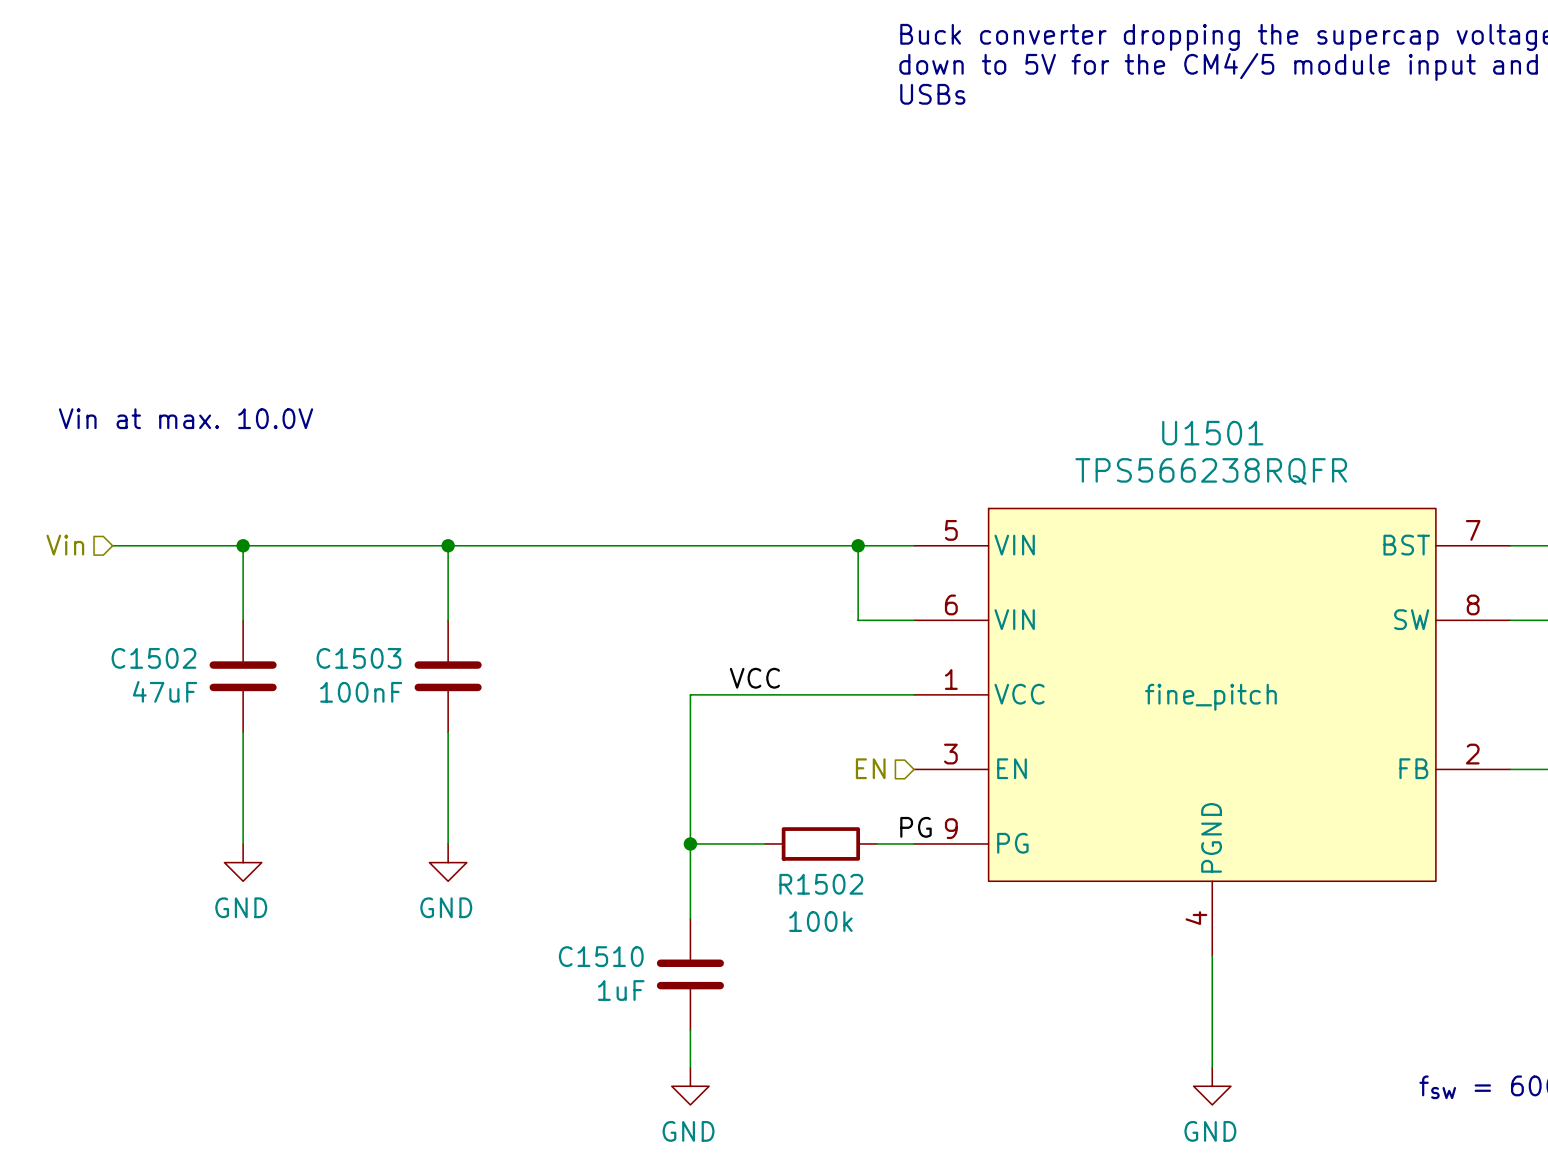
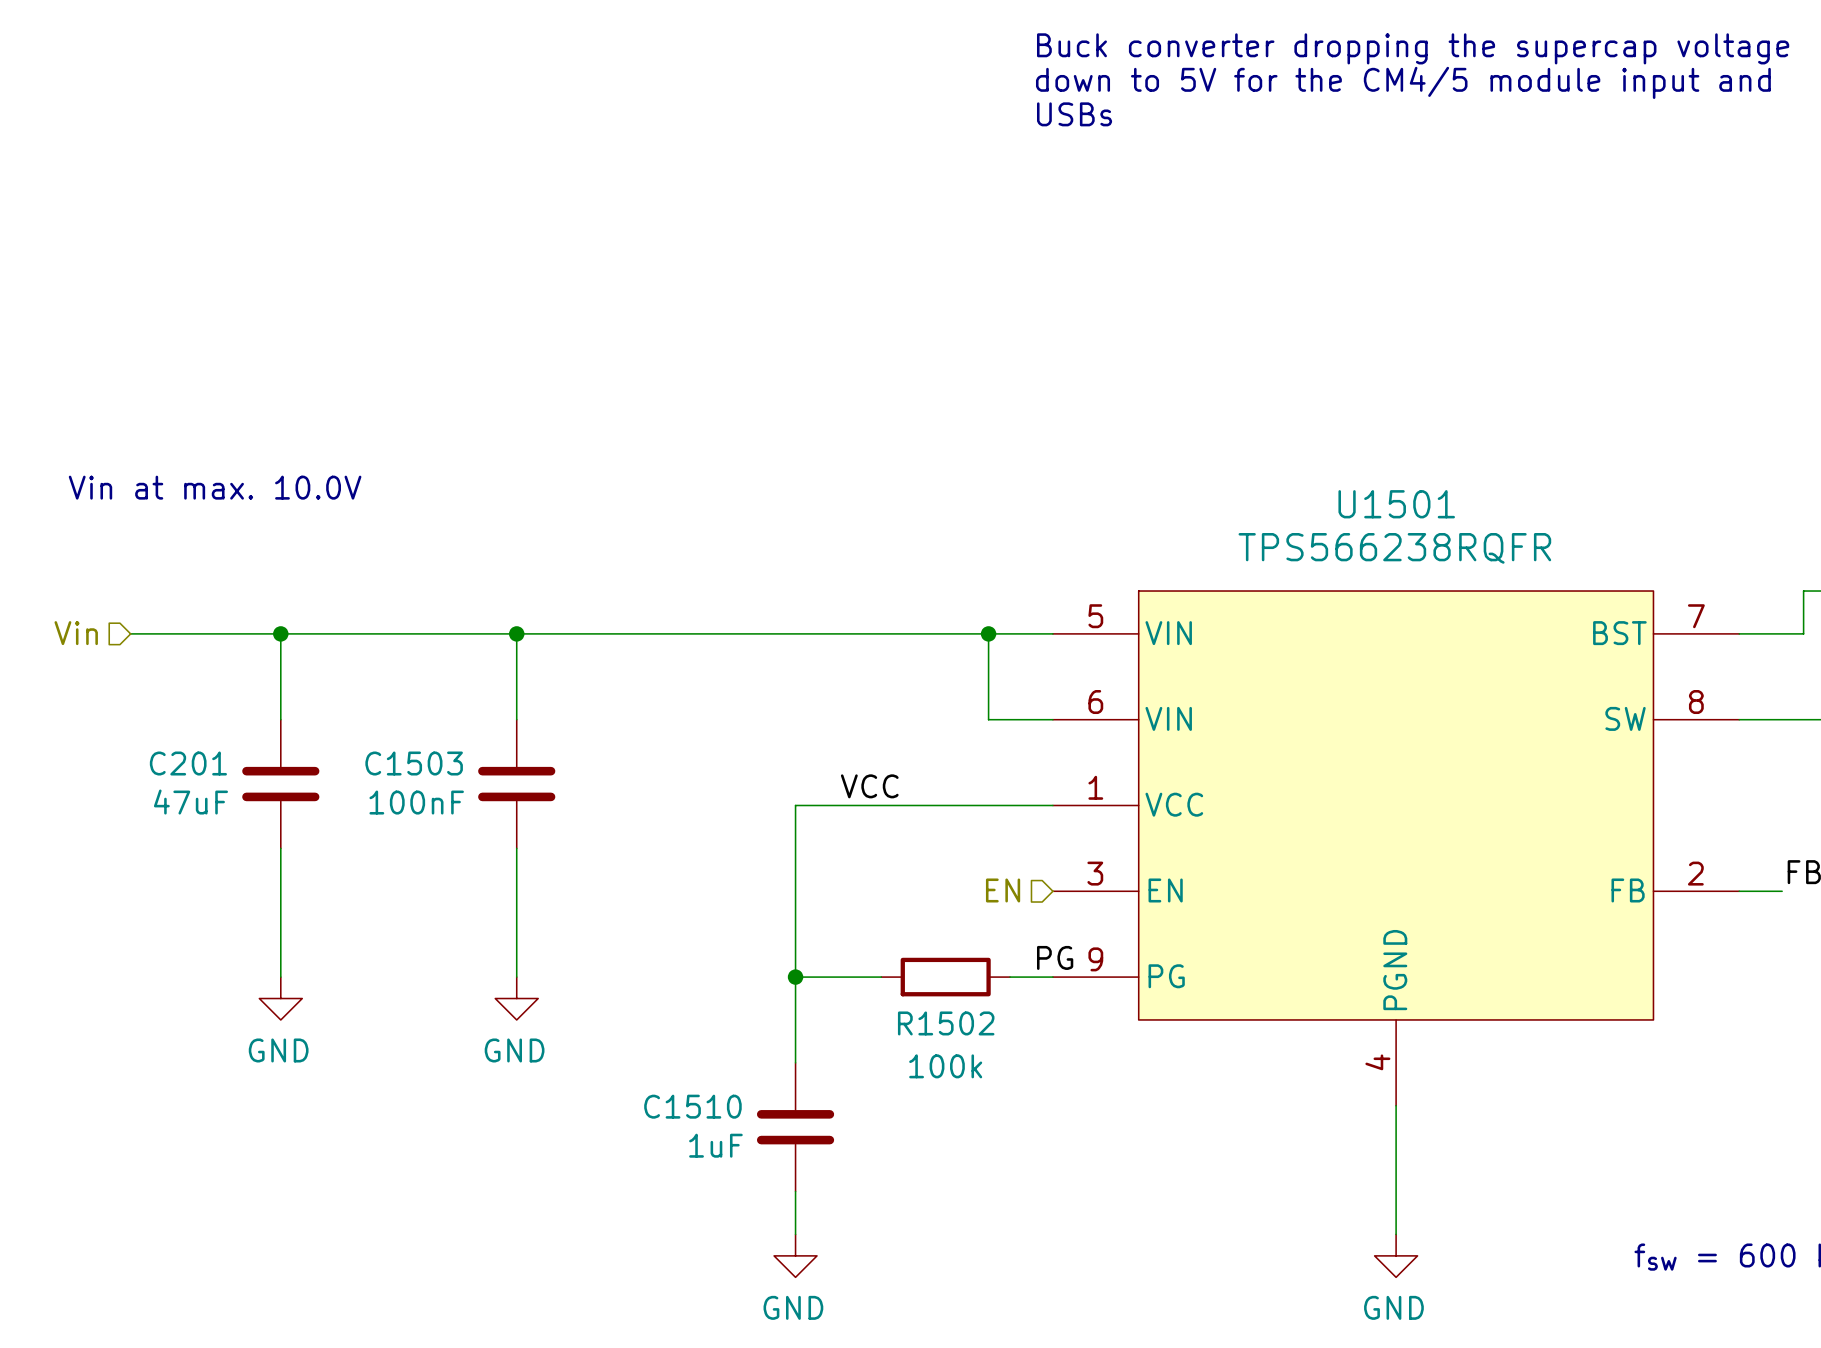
C1502 name: C1502 (153, 658) -> C201 (188, 763)
U1501 text: fine_pitch (1210, 697) -> none

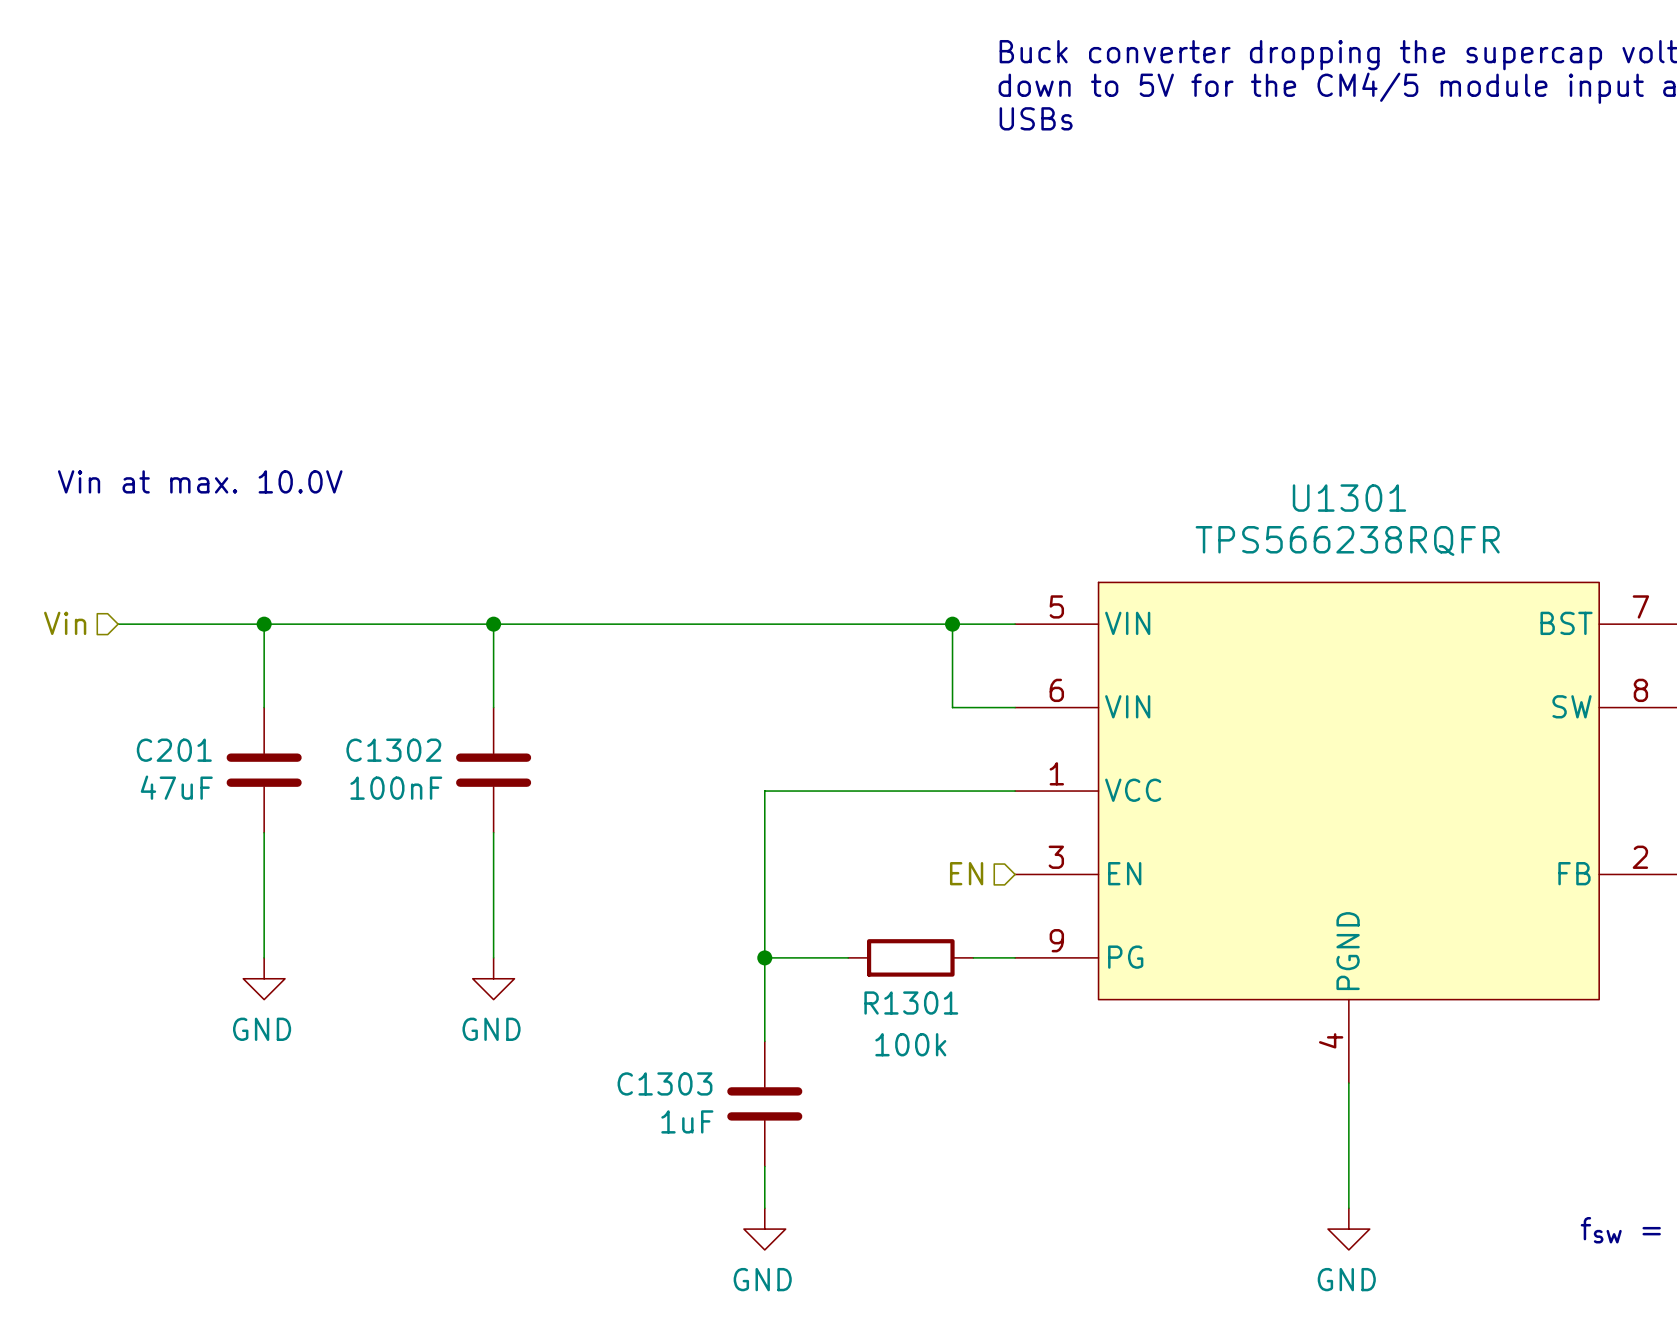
U1501 name: U1501 (1396, 504) -> U1301 (1349, 498)
C1503 name: C1503 (414, 763) -> C1302 (393, 750)
label: VCC (869, 786) -> none
label: PG (1055, 957) -> none
R1502 name: R1502 (946, 1023) -> R1301 (911, 1003)
C1510 name: C1510 (692, 1106) -> C1303 (665, 1083)

